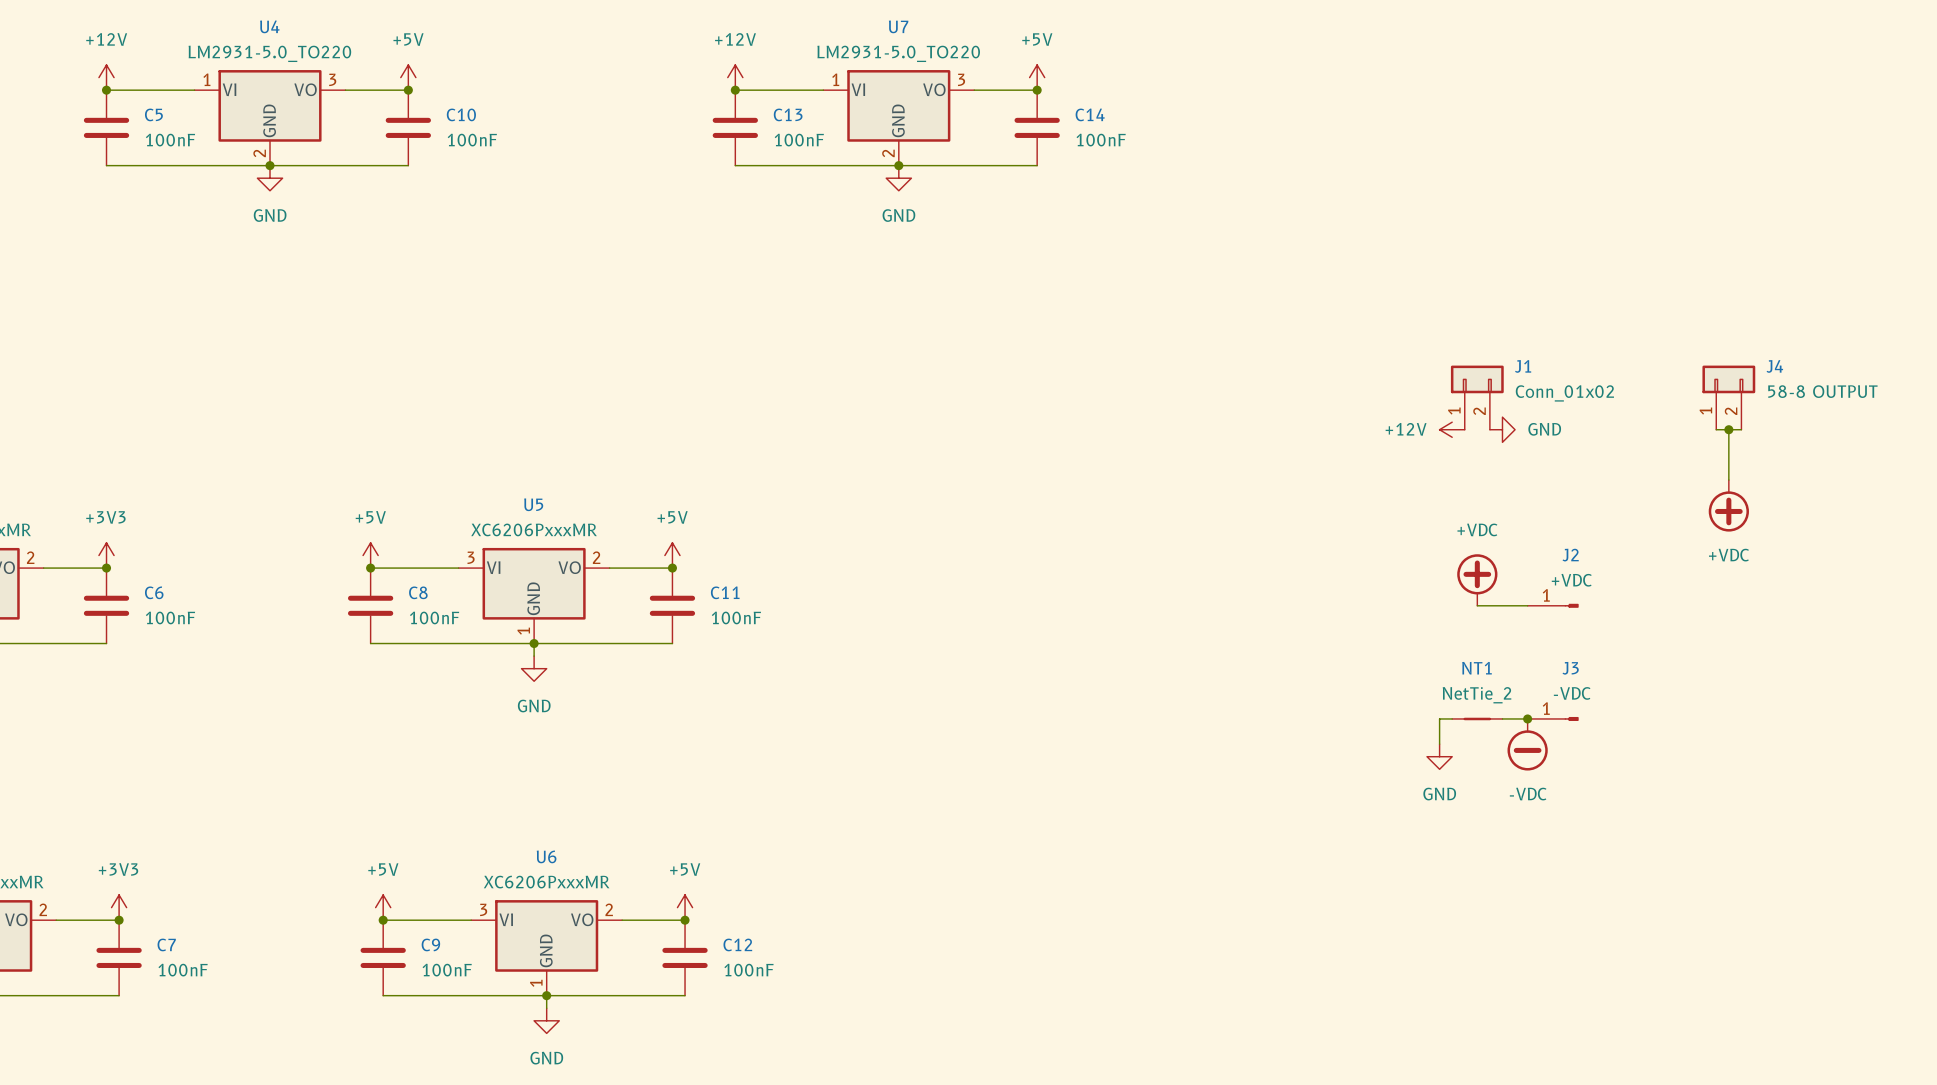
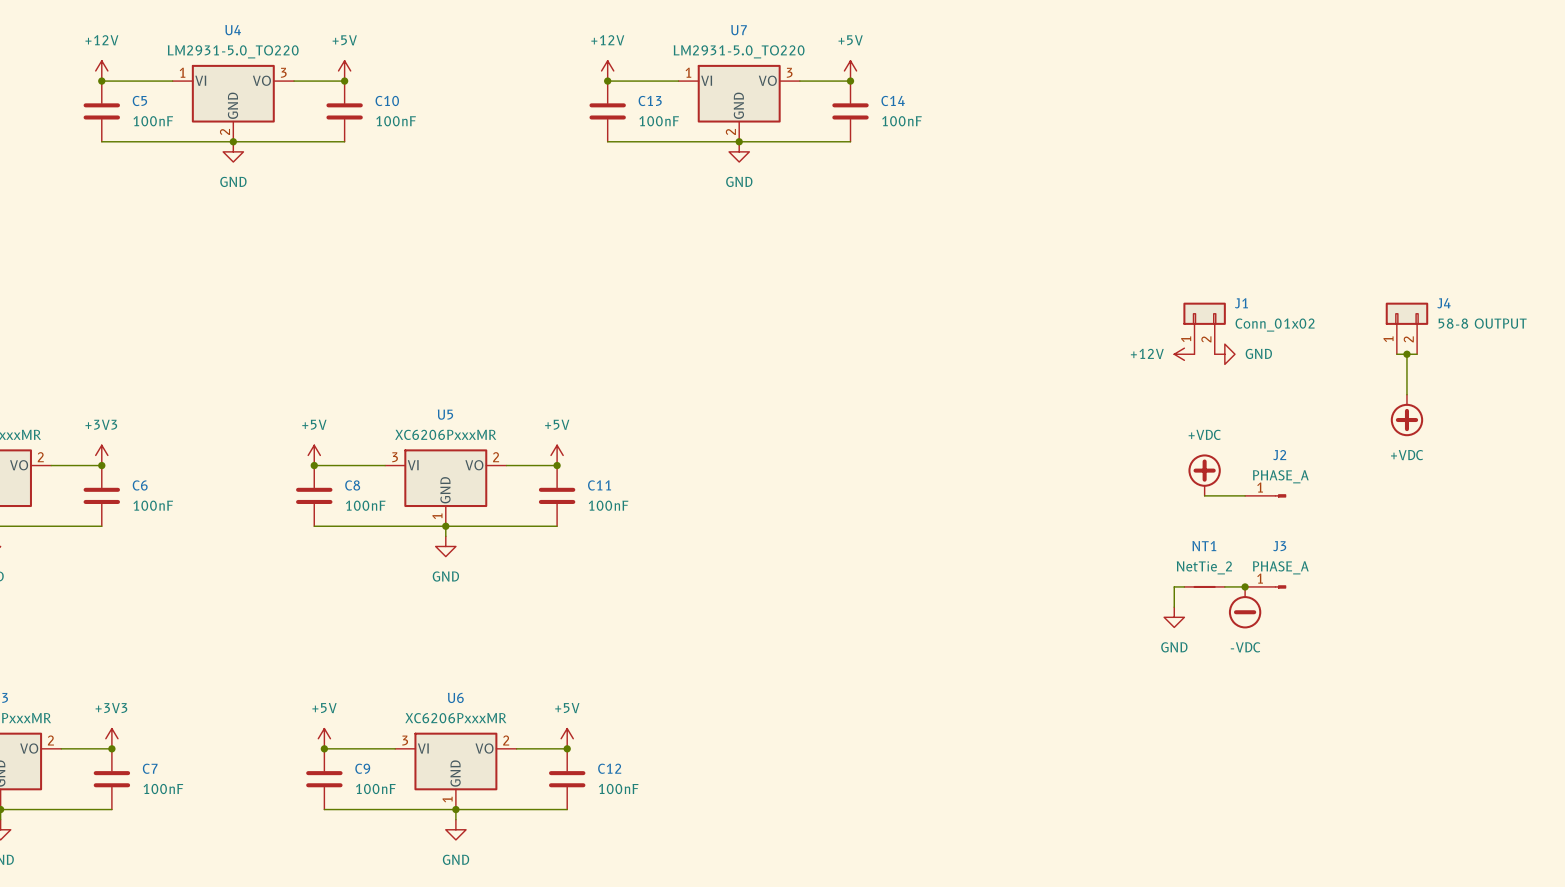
J2 value: +VDC (1571, 580) -> PHASE_A (1280, 476)
J3 value: -VDC (1572, 693) -> PHASE_A (1280, 567)

